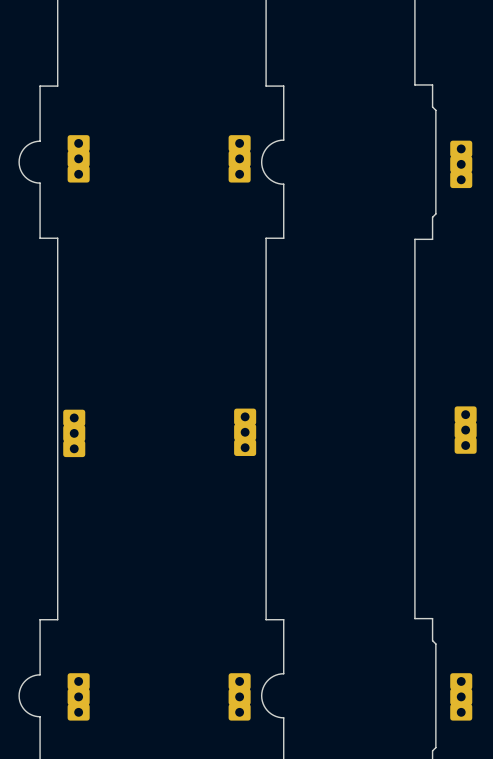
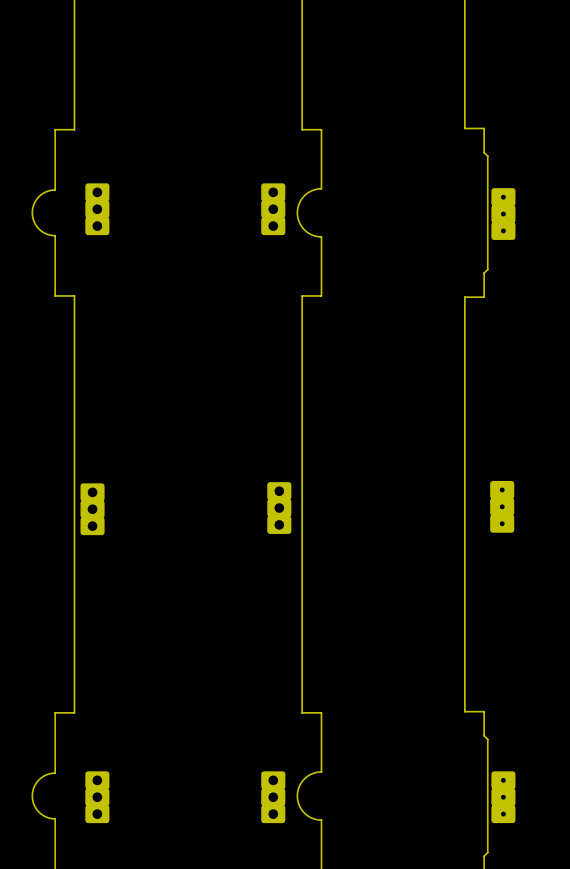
part: none -> (503, 214)
part: (461, 164) -> none
part: (465, 430) -> none
part: none -> (502, 506)
part footprint: [450, 673, 473, 721] -> [491, 771, 516, 824]

